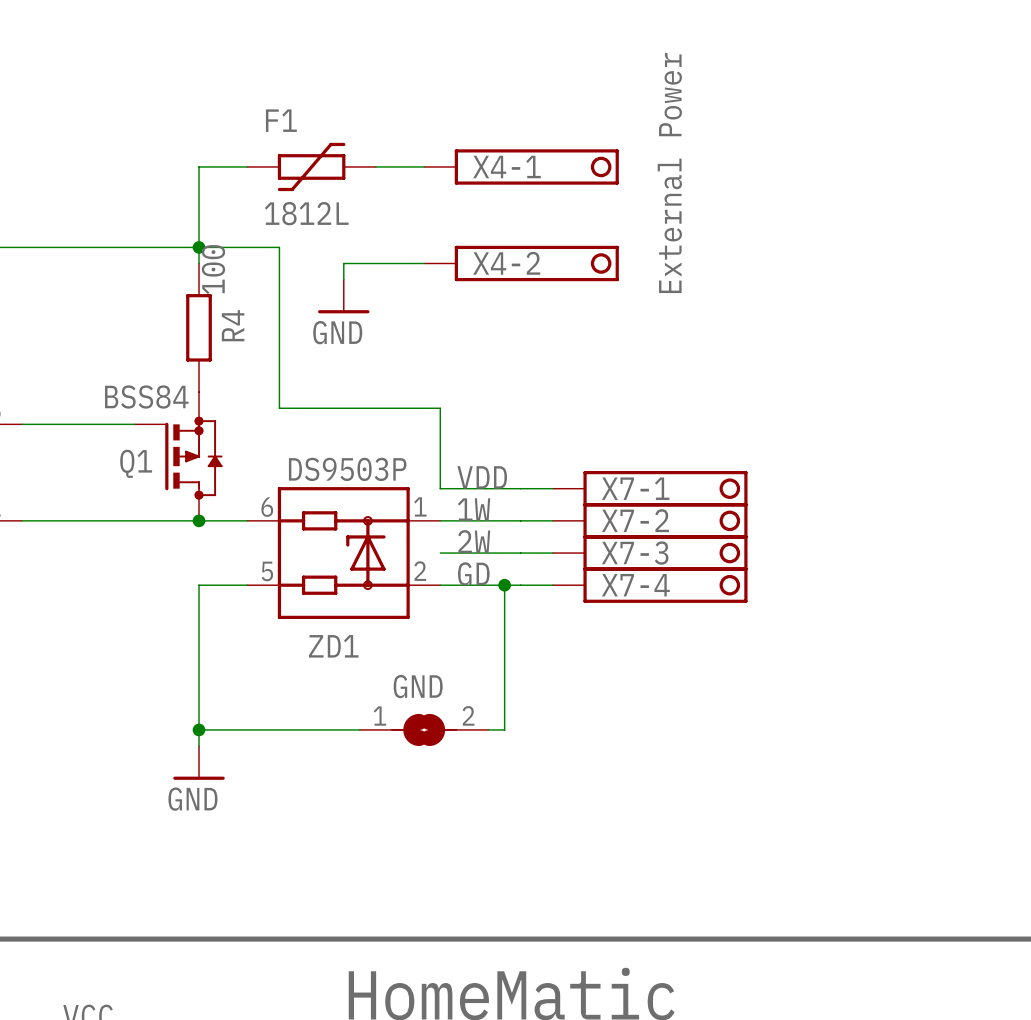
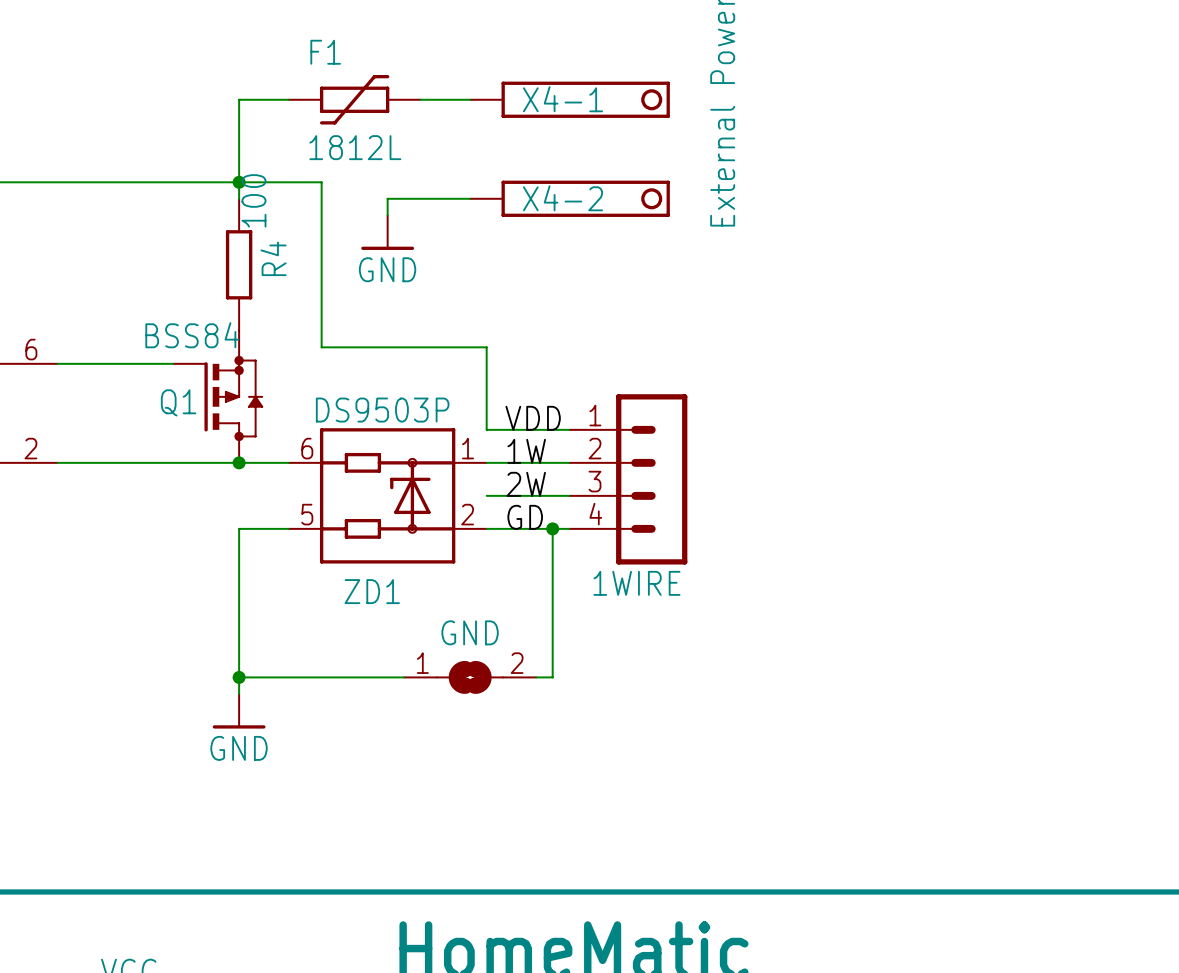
X7-1: (650, 488) -> none
X7-2: (650, 520) -> none
1WIRE: none -> (628, 479)
X7-3: (650, 553) -> none
X7-4: (650, 585) -> none

